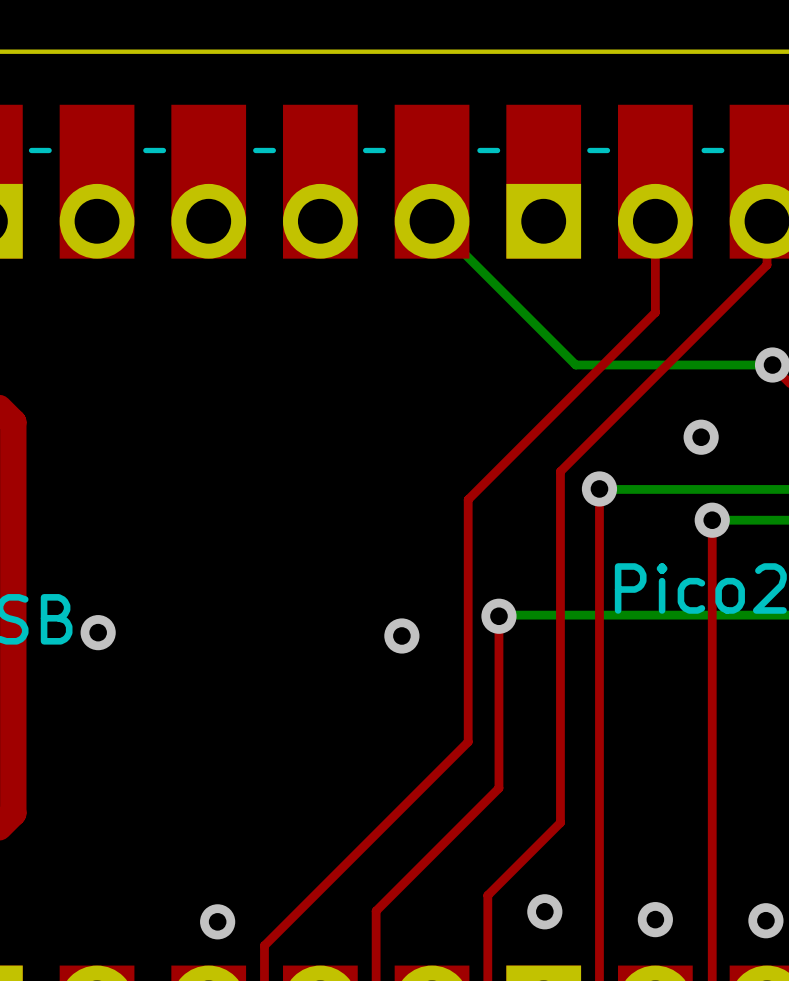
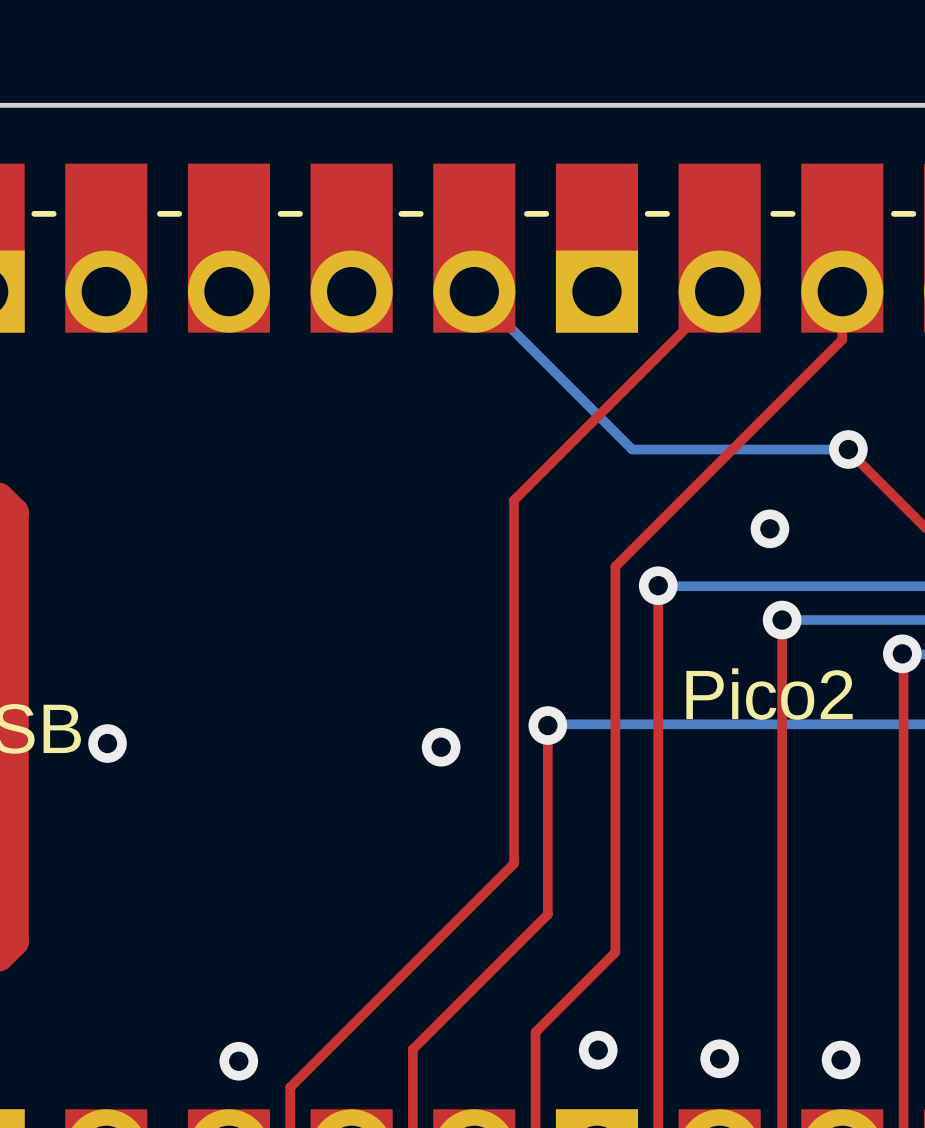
top track: (655, 224) (655, 312) (468, 499) -> (719, 294) (514, 500) (514, 597)

